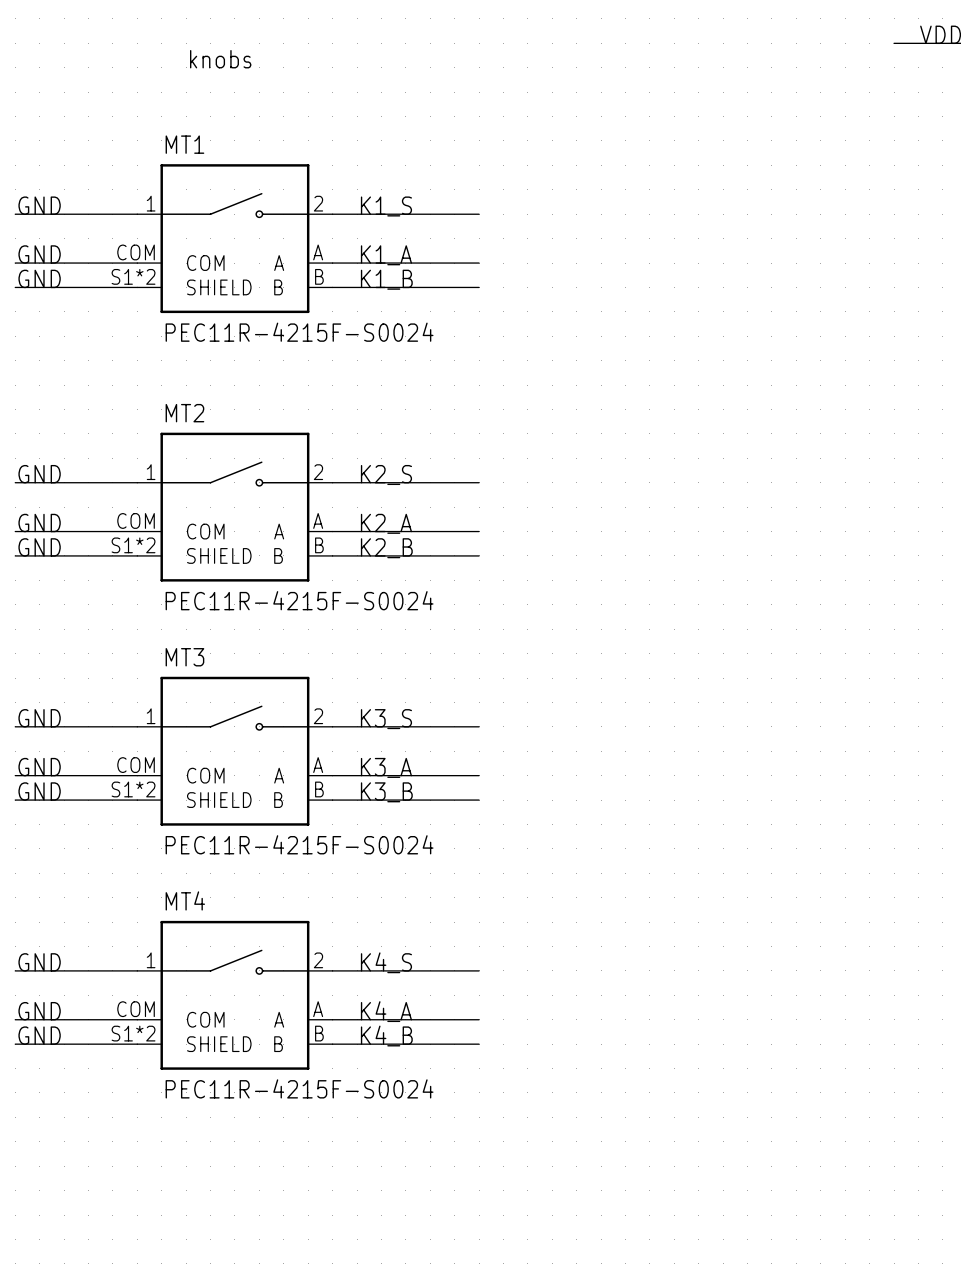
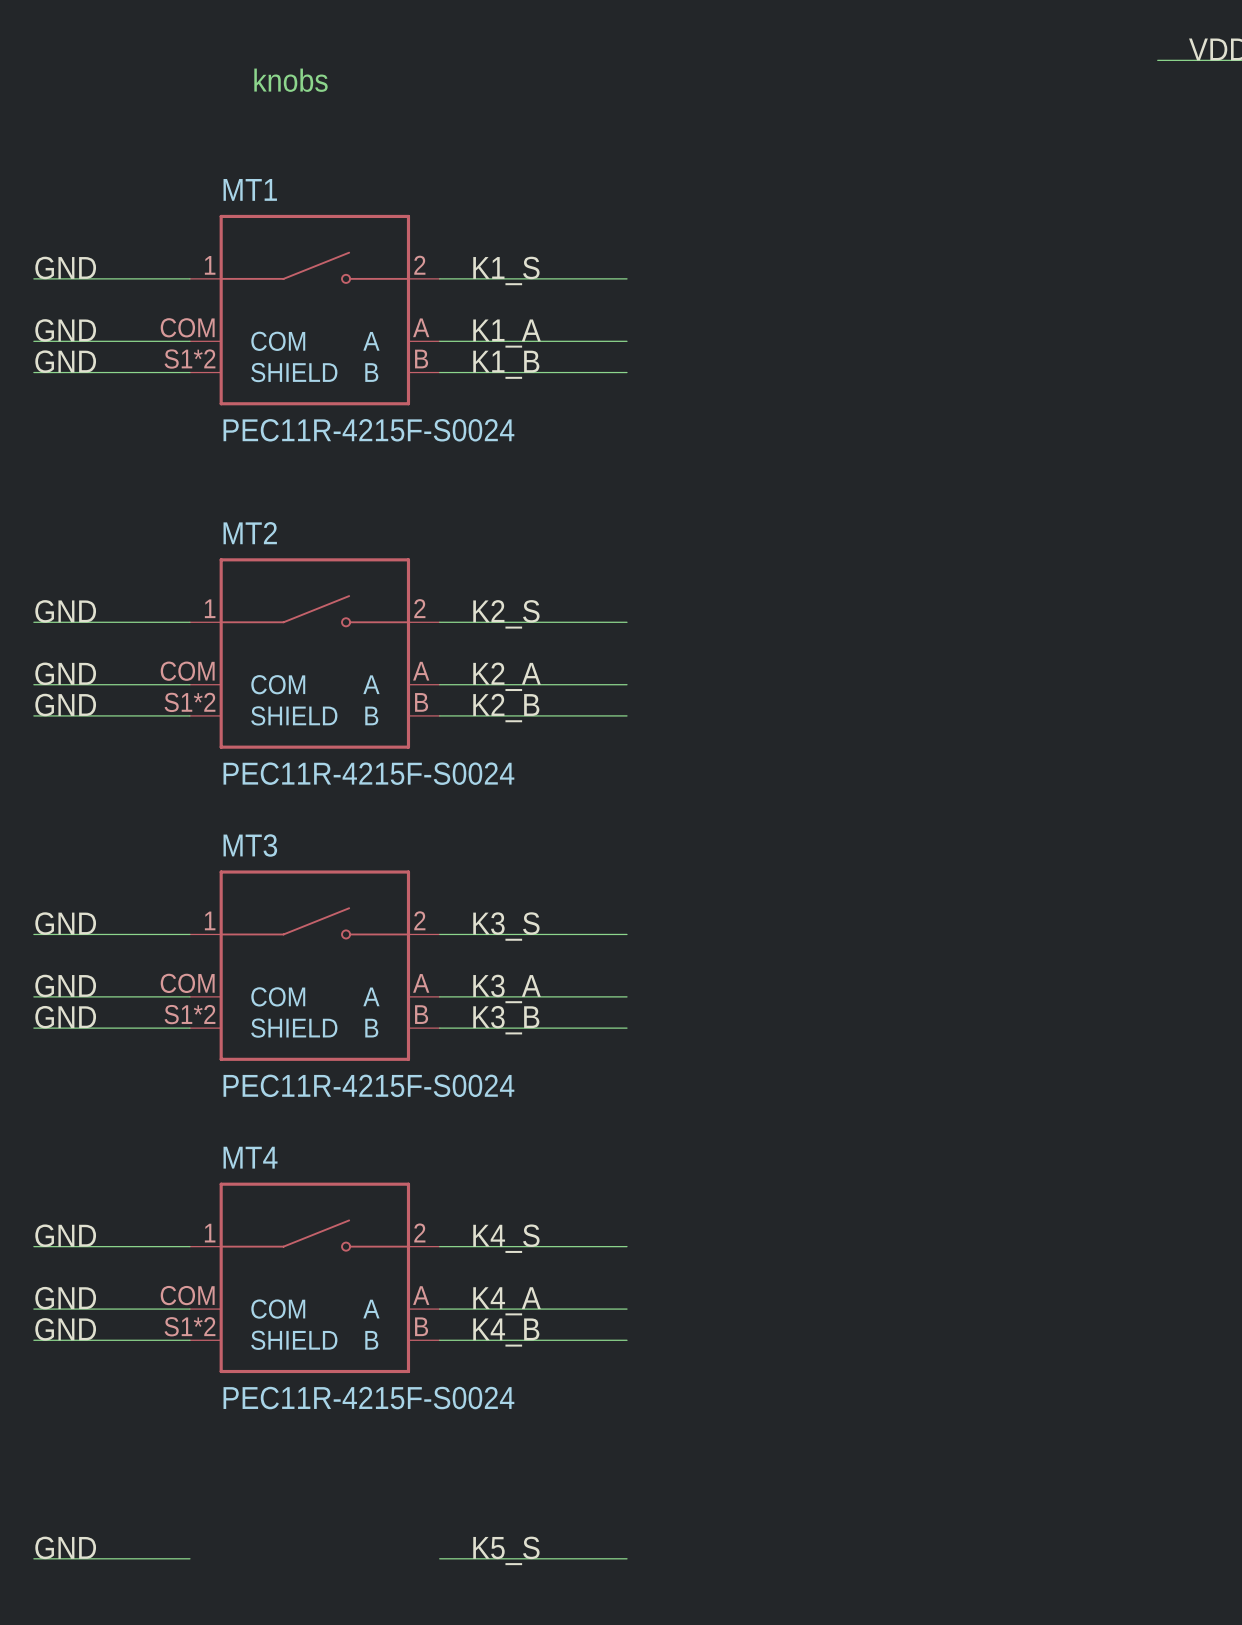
label: none -> GND (65, 1547)
label: none -> K5_S (506, 1550)
wire: none -> (33, 1558) (189, 1558)
wire: none -> (439, 1558) (627, 1558)

